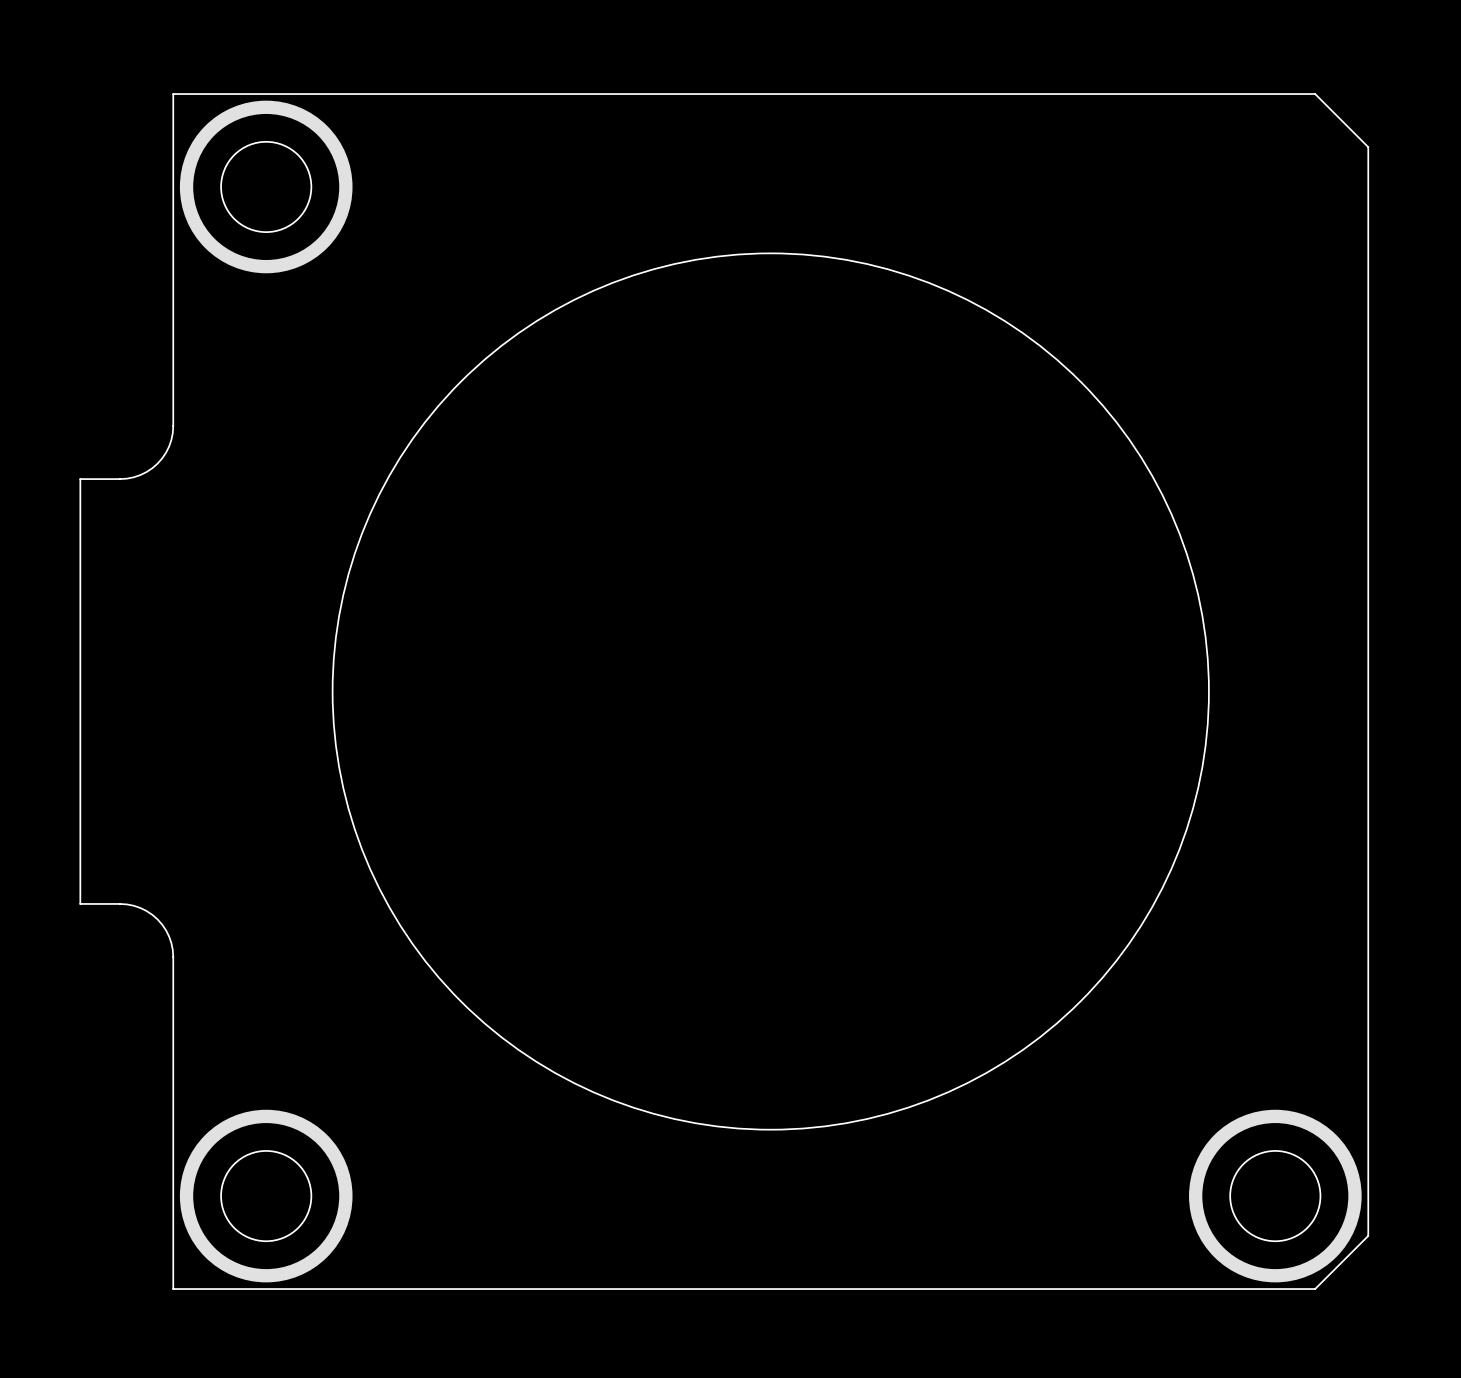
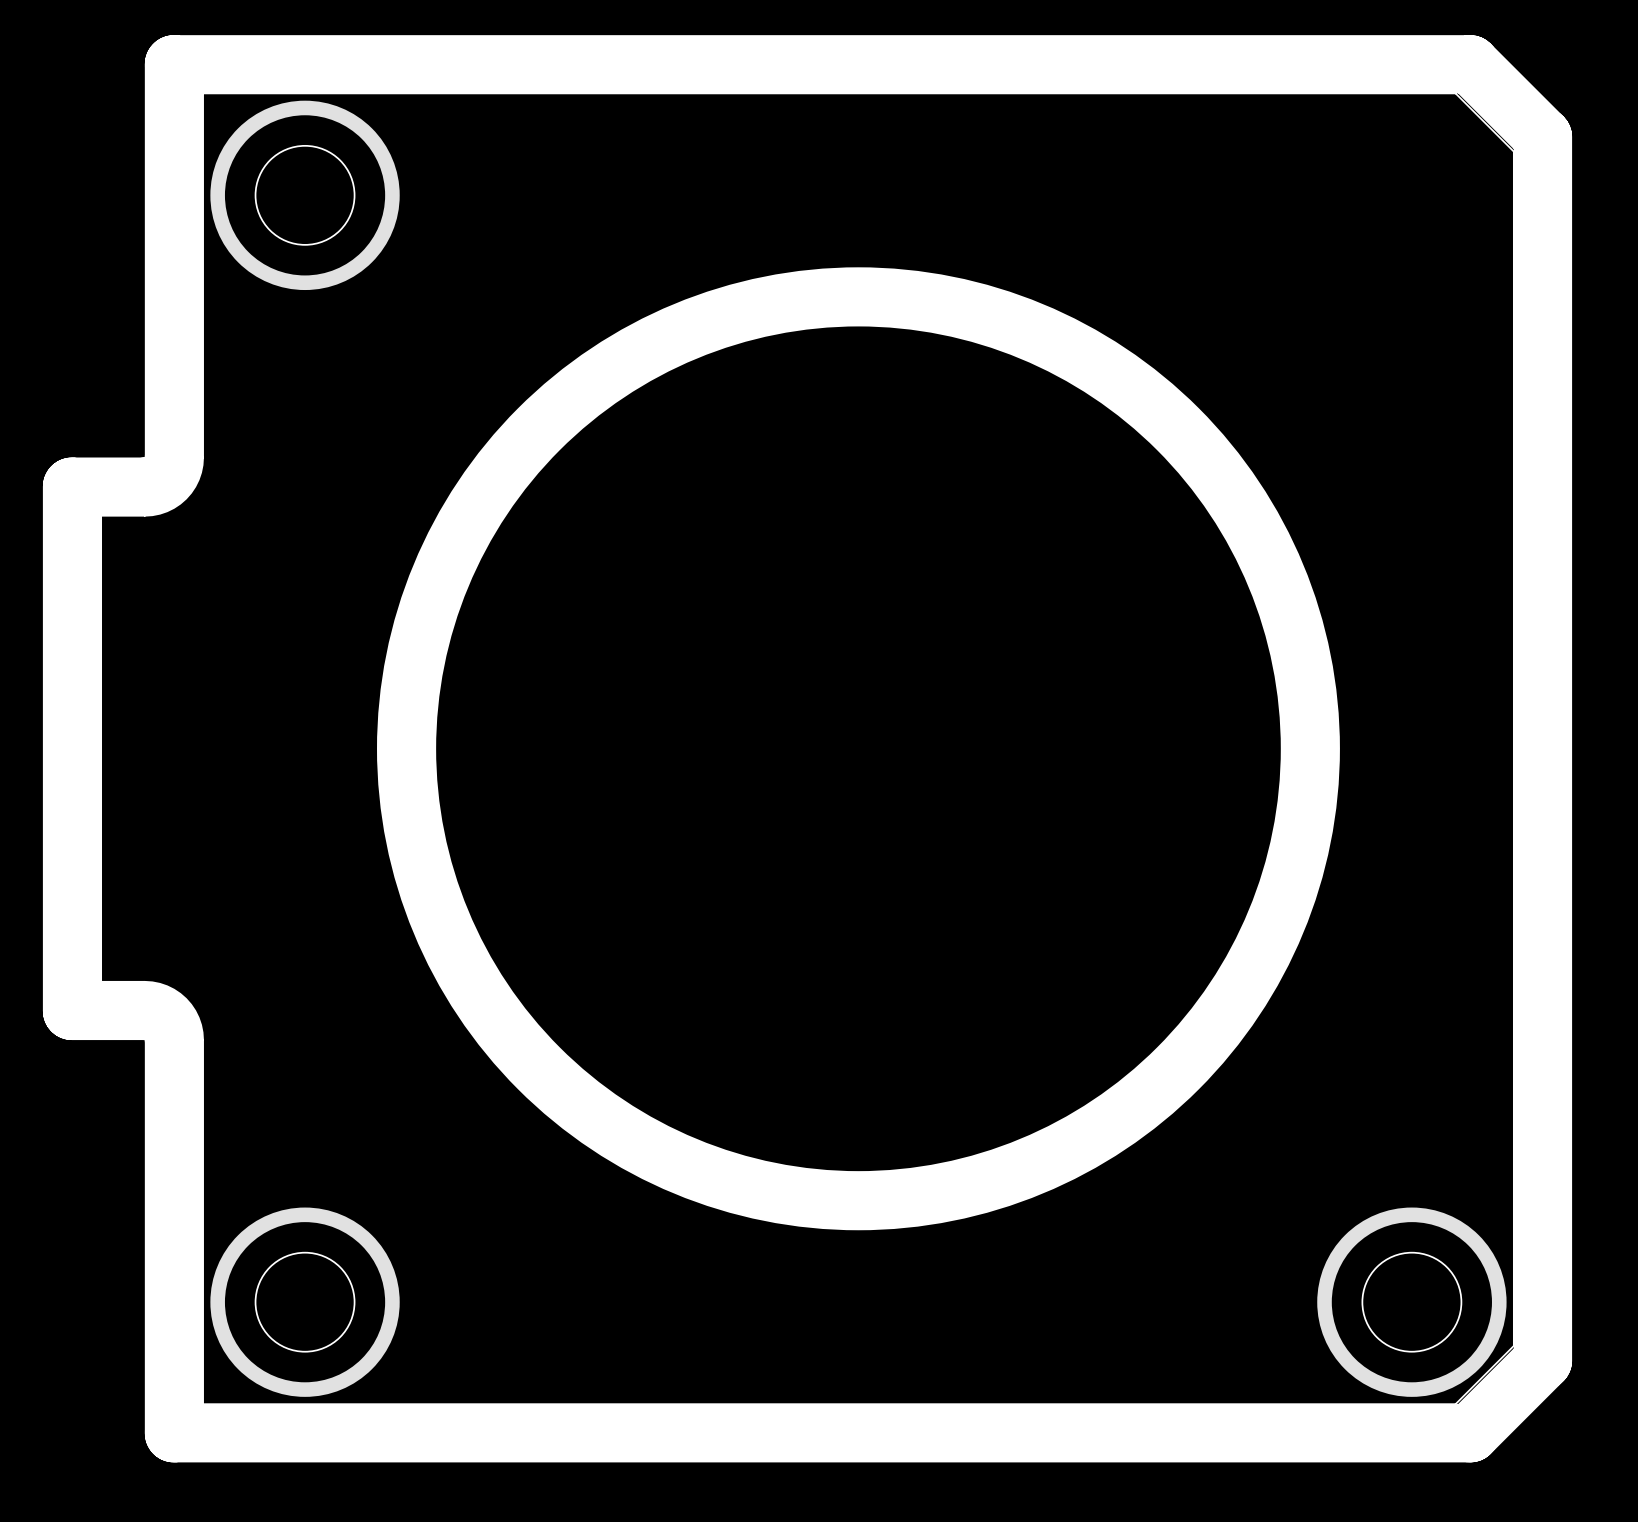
board edge: none -> (173, 64) (1470, 64) (1542, 137) (1542, 1360) (1470, 1433) (173, 1433) (172, 1032) (165, 1019) (152, 1011) (72, 1010) (72, 486) (152, 485) (165, 478) (172, 465) (173, 64)
round board edge: none -> [377, 268, 1340, 1230]

